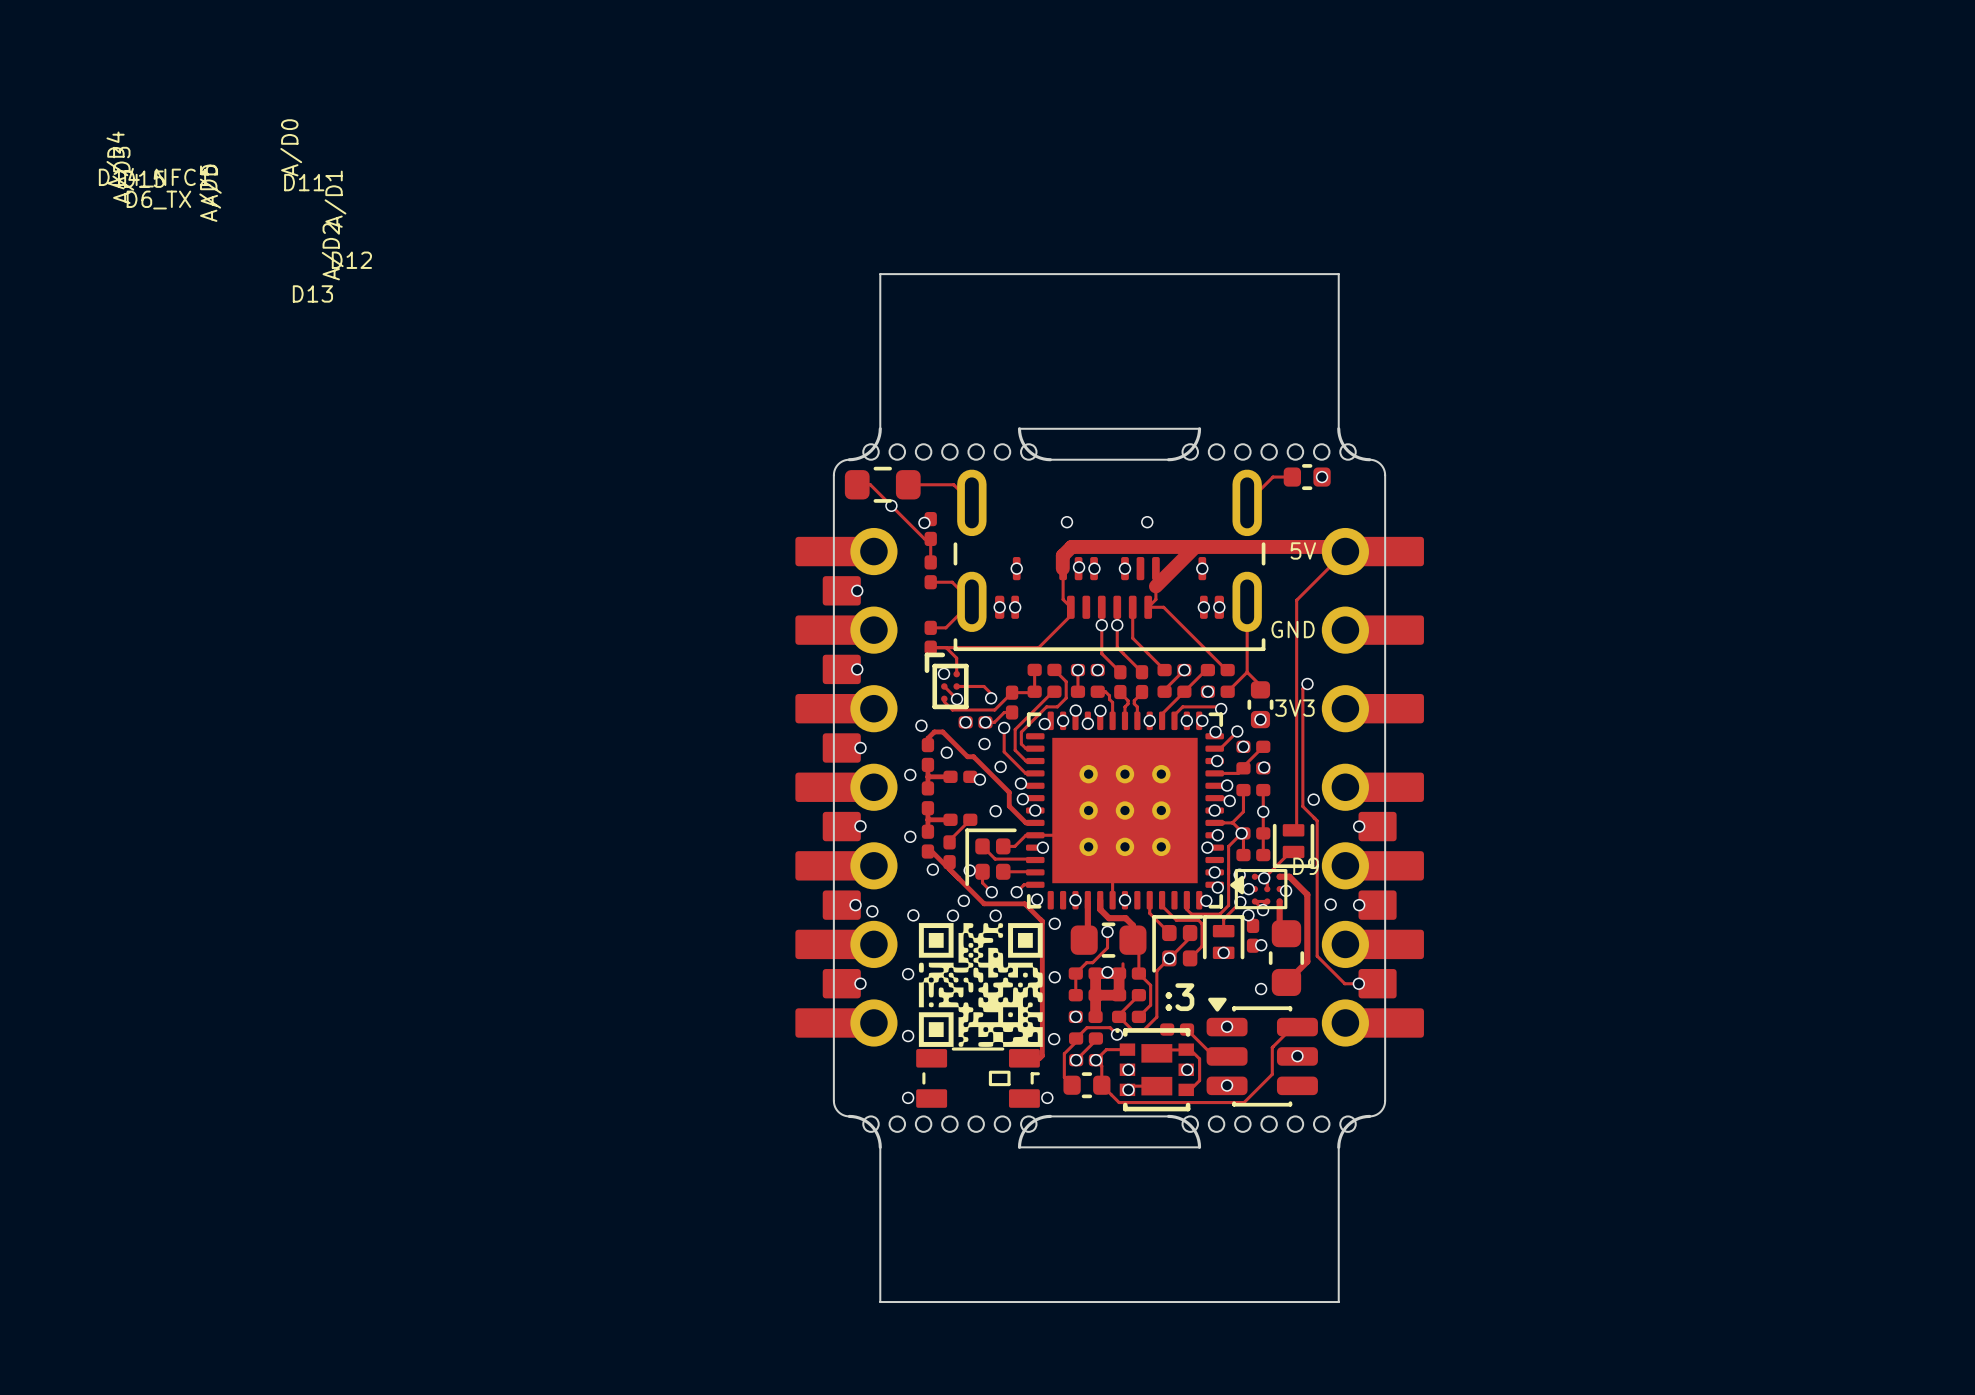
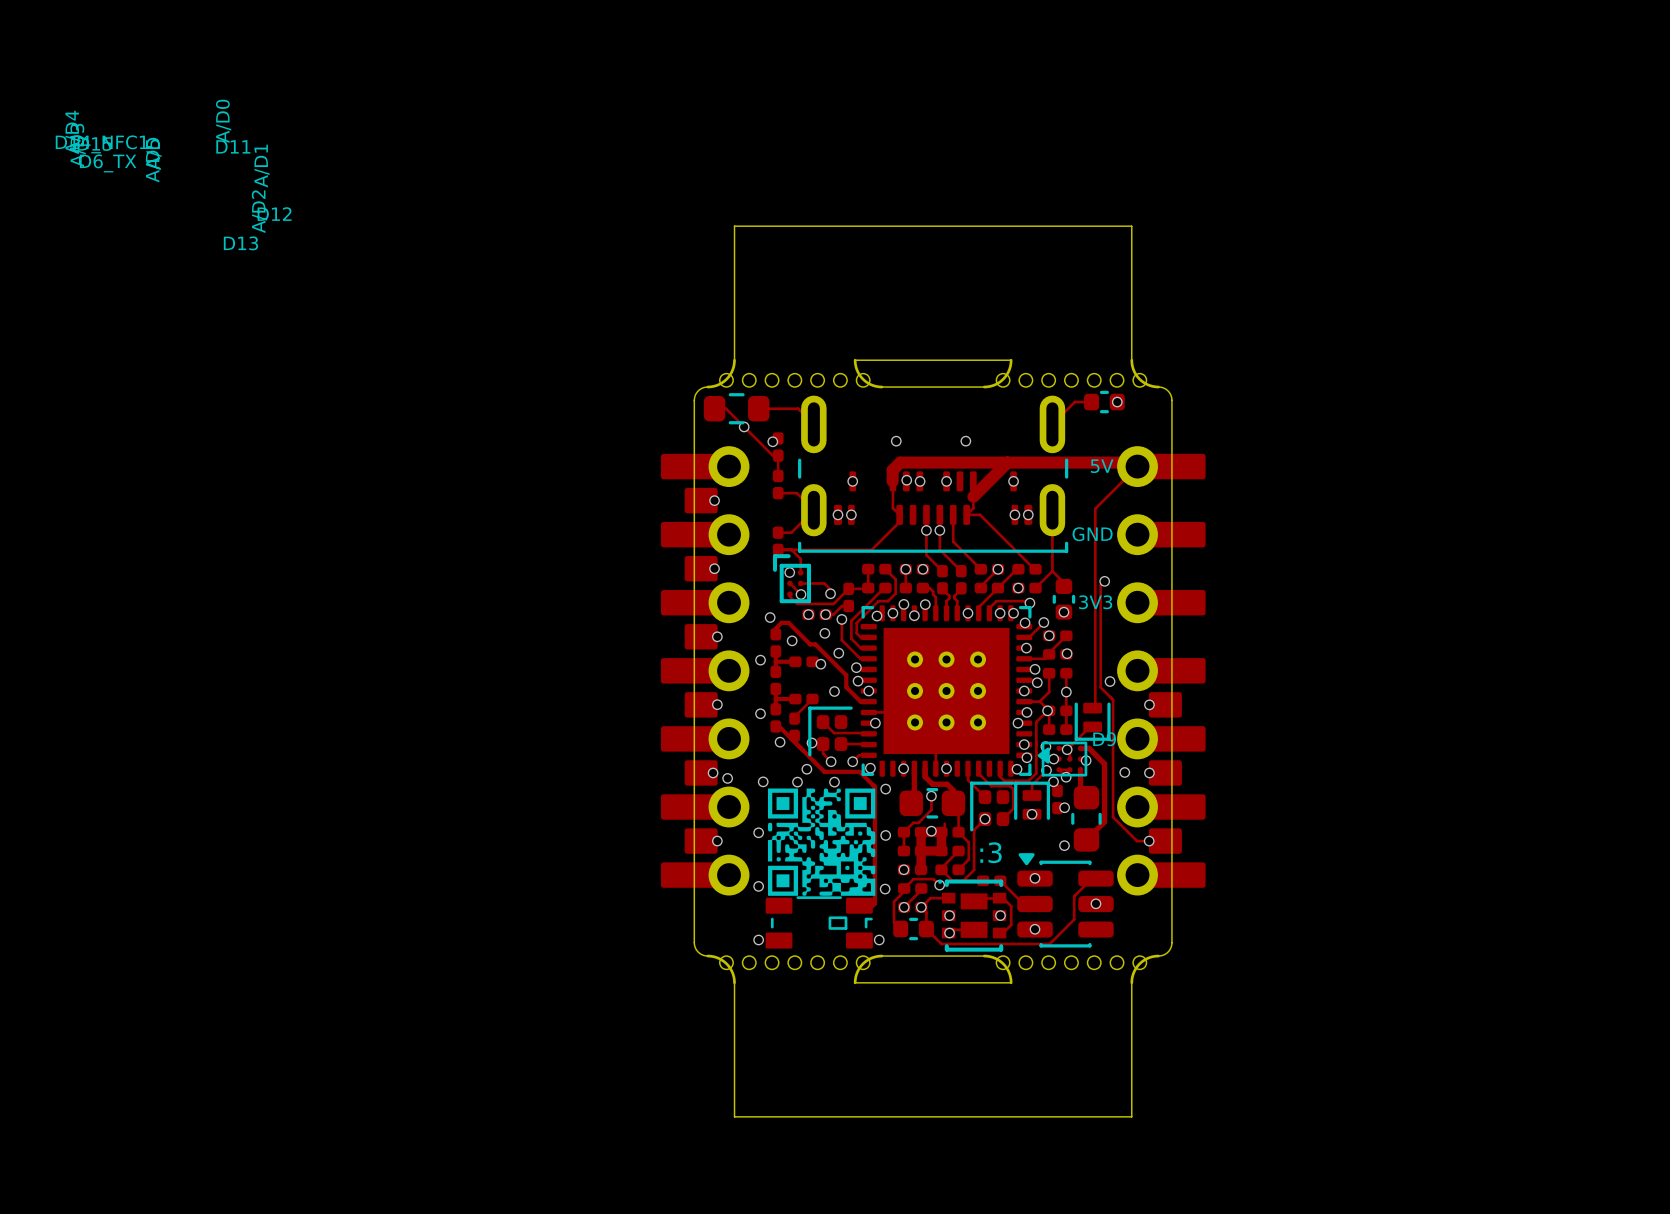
track: (1035, 835) (1025, 835) (1014, 846) (1003, 846) -> none
track: (1190, 933) (1190, 937) (1169, 958) -> none

